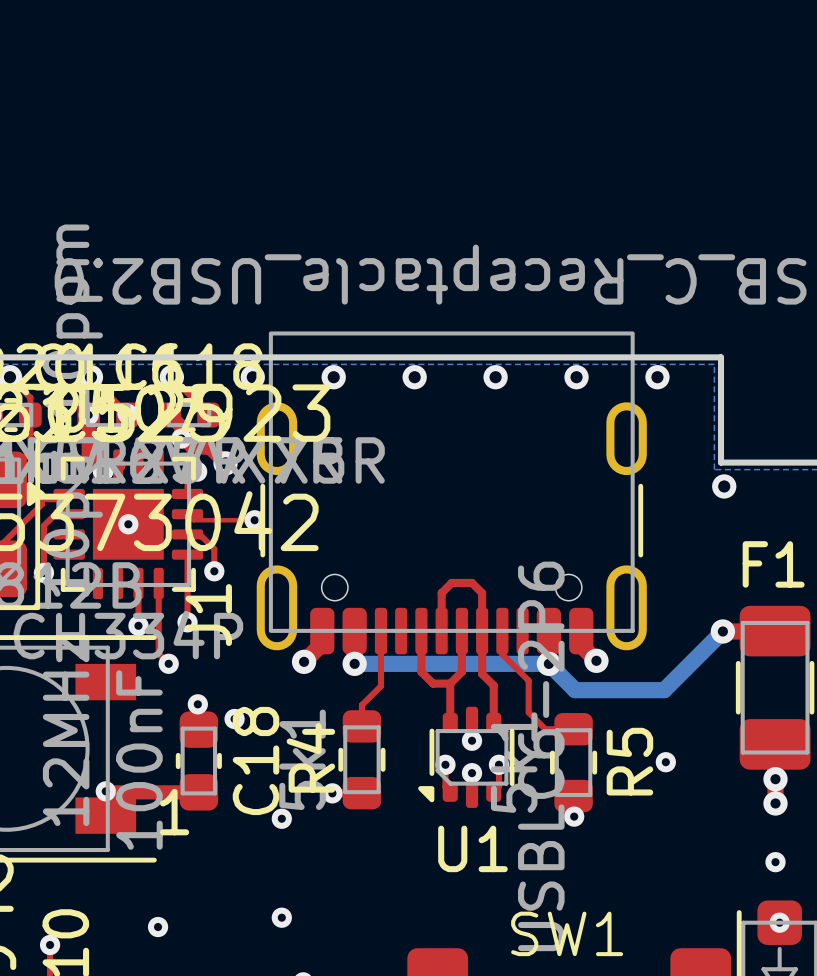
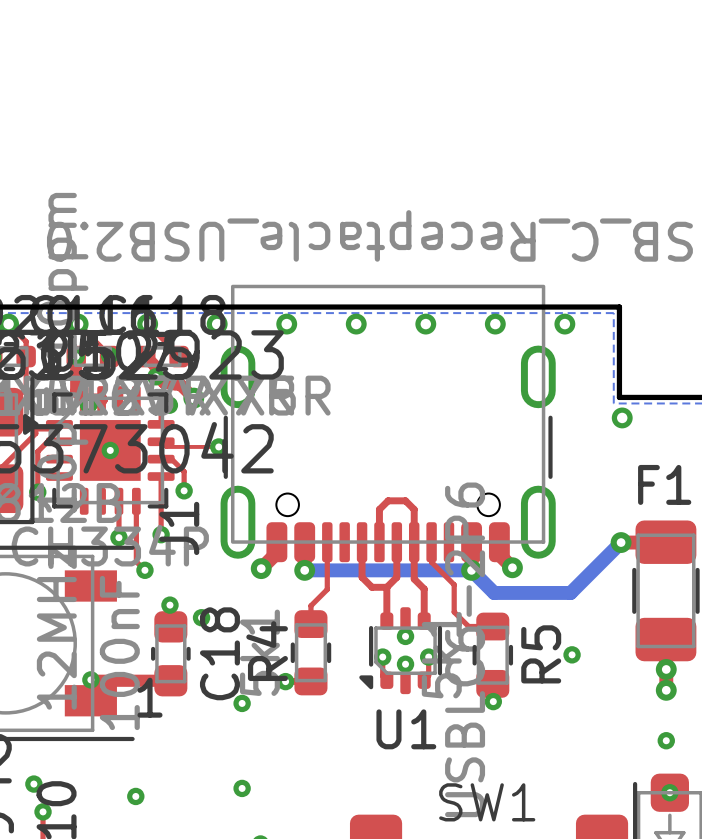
via: none -> (33, 784)

